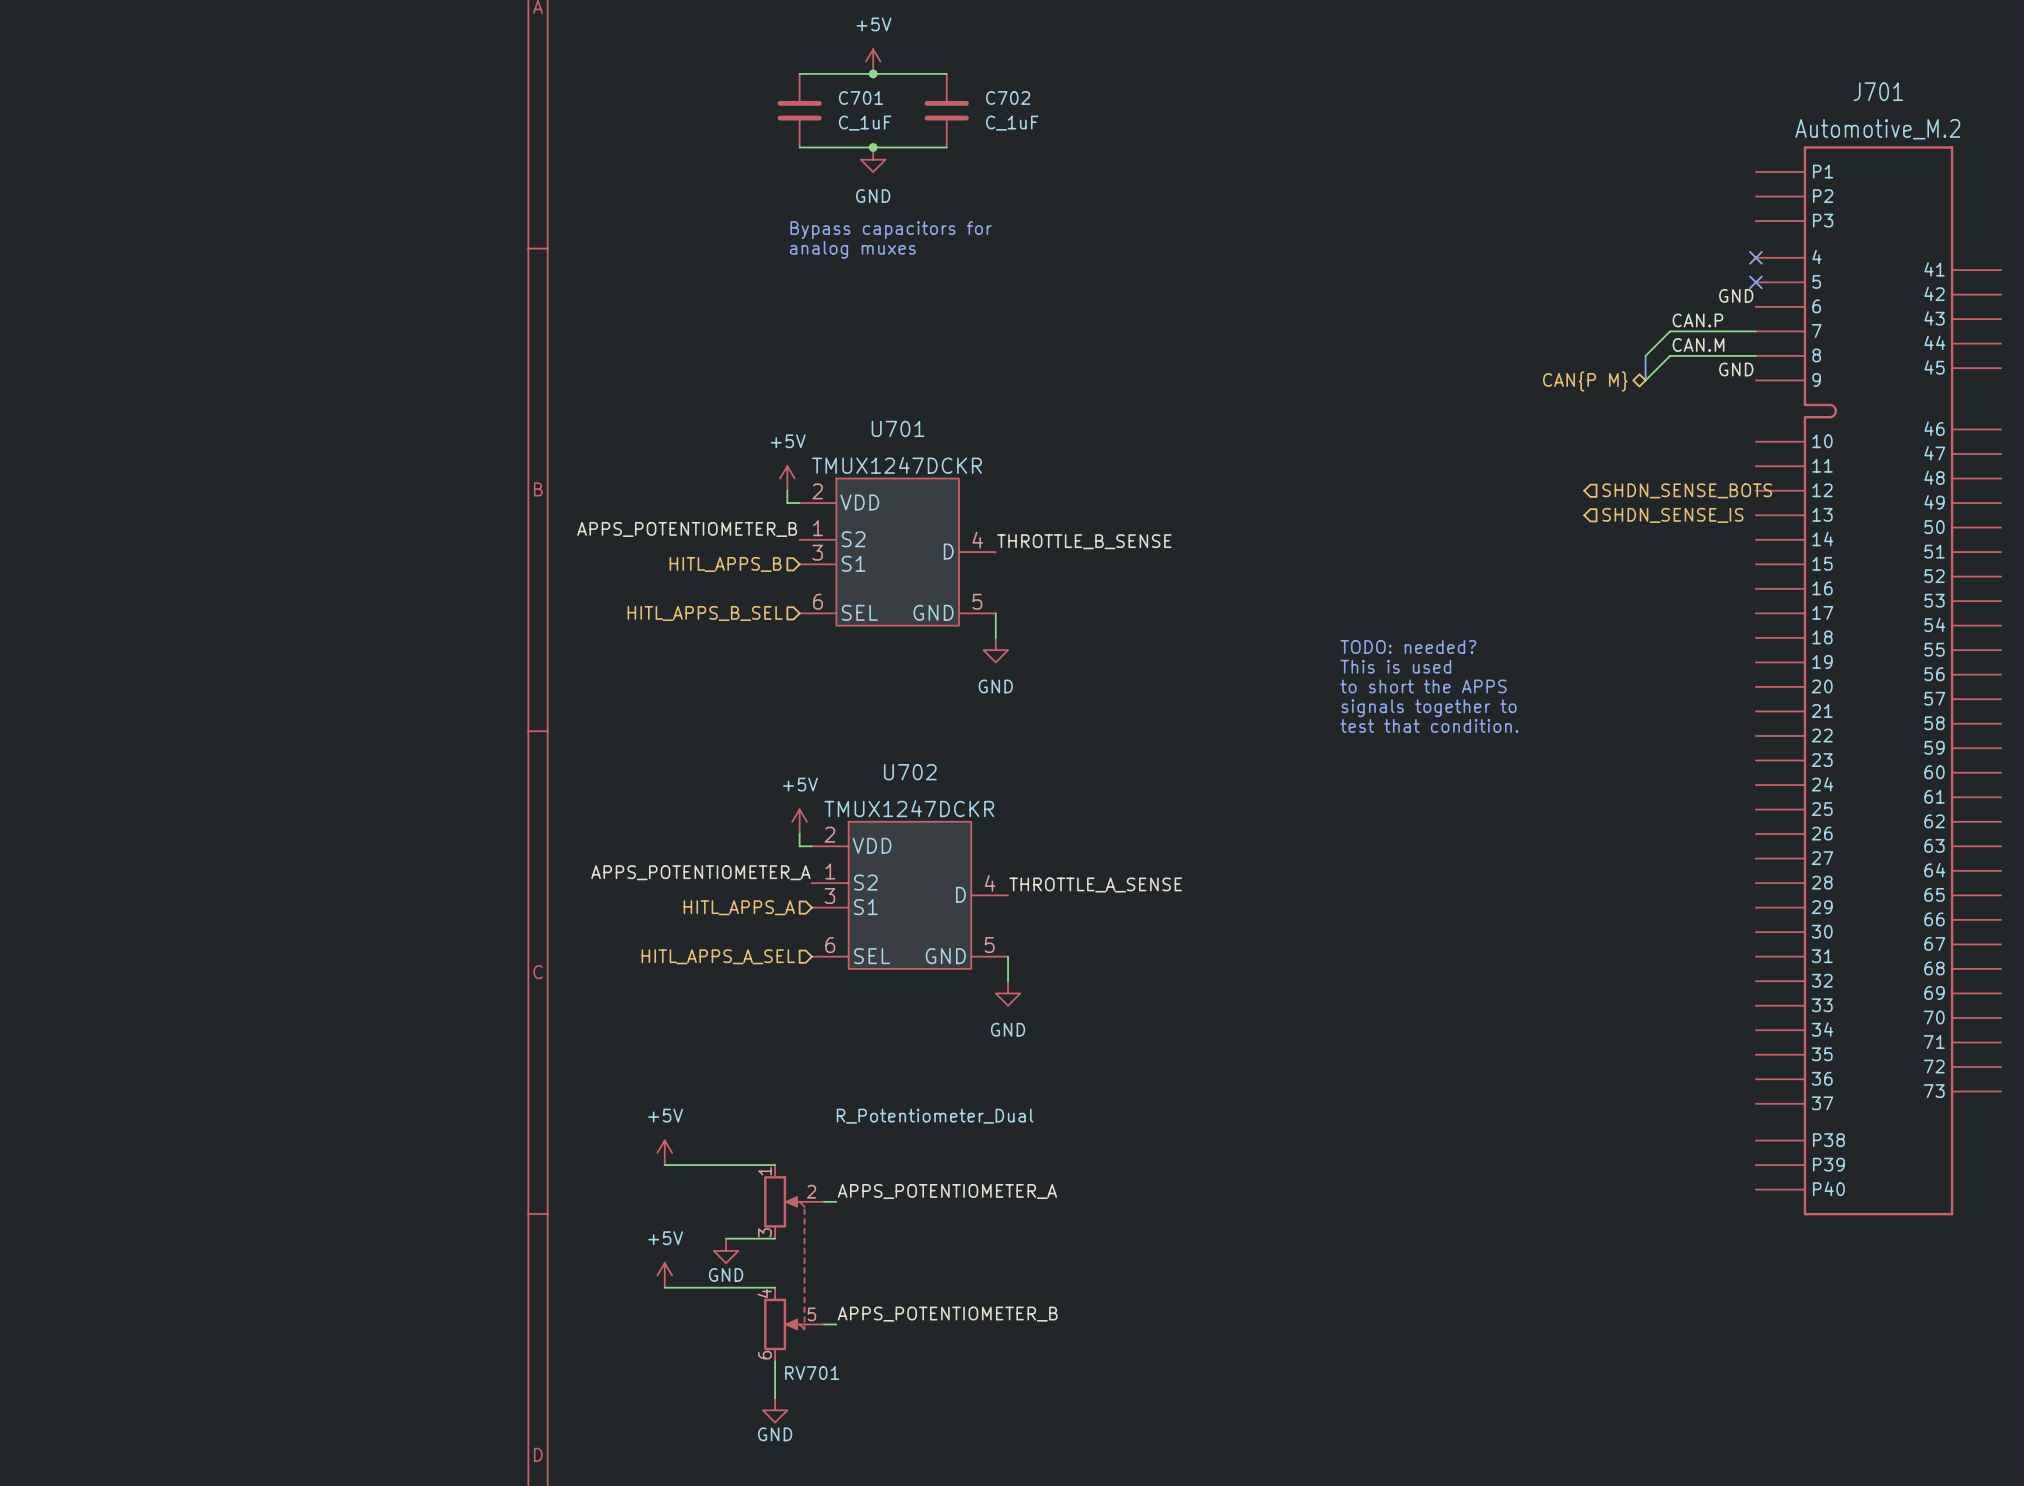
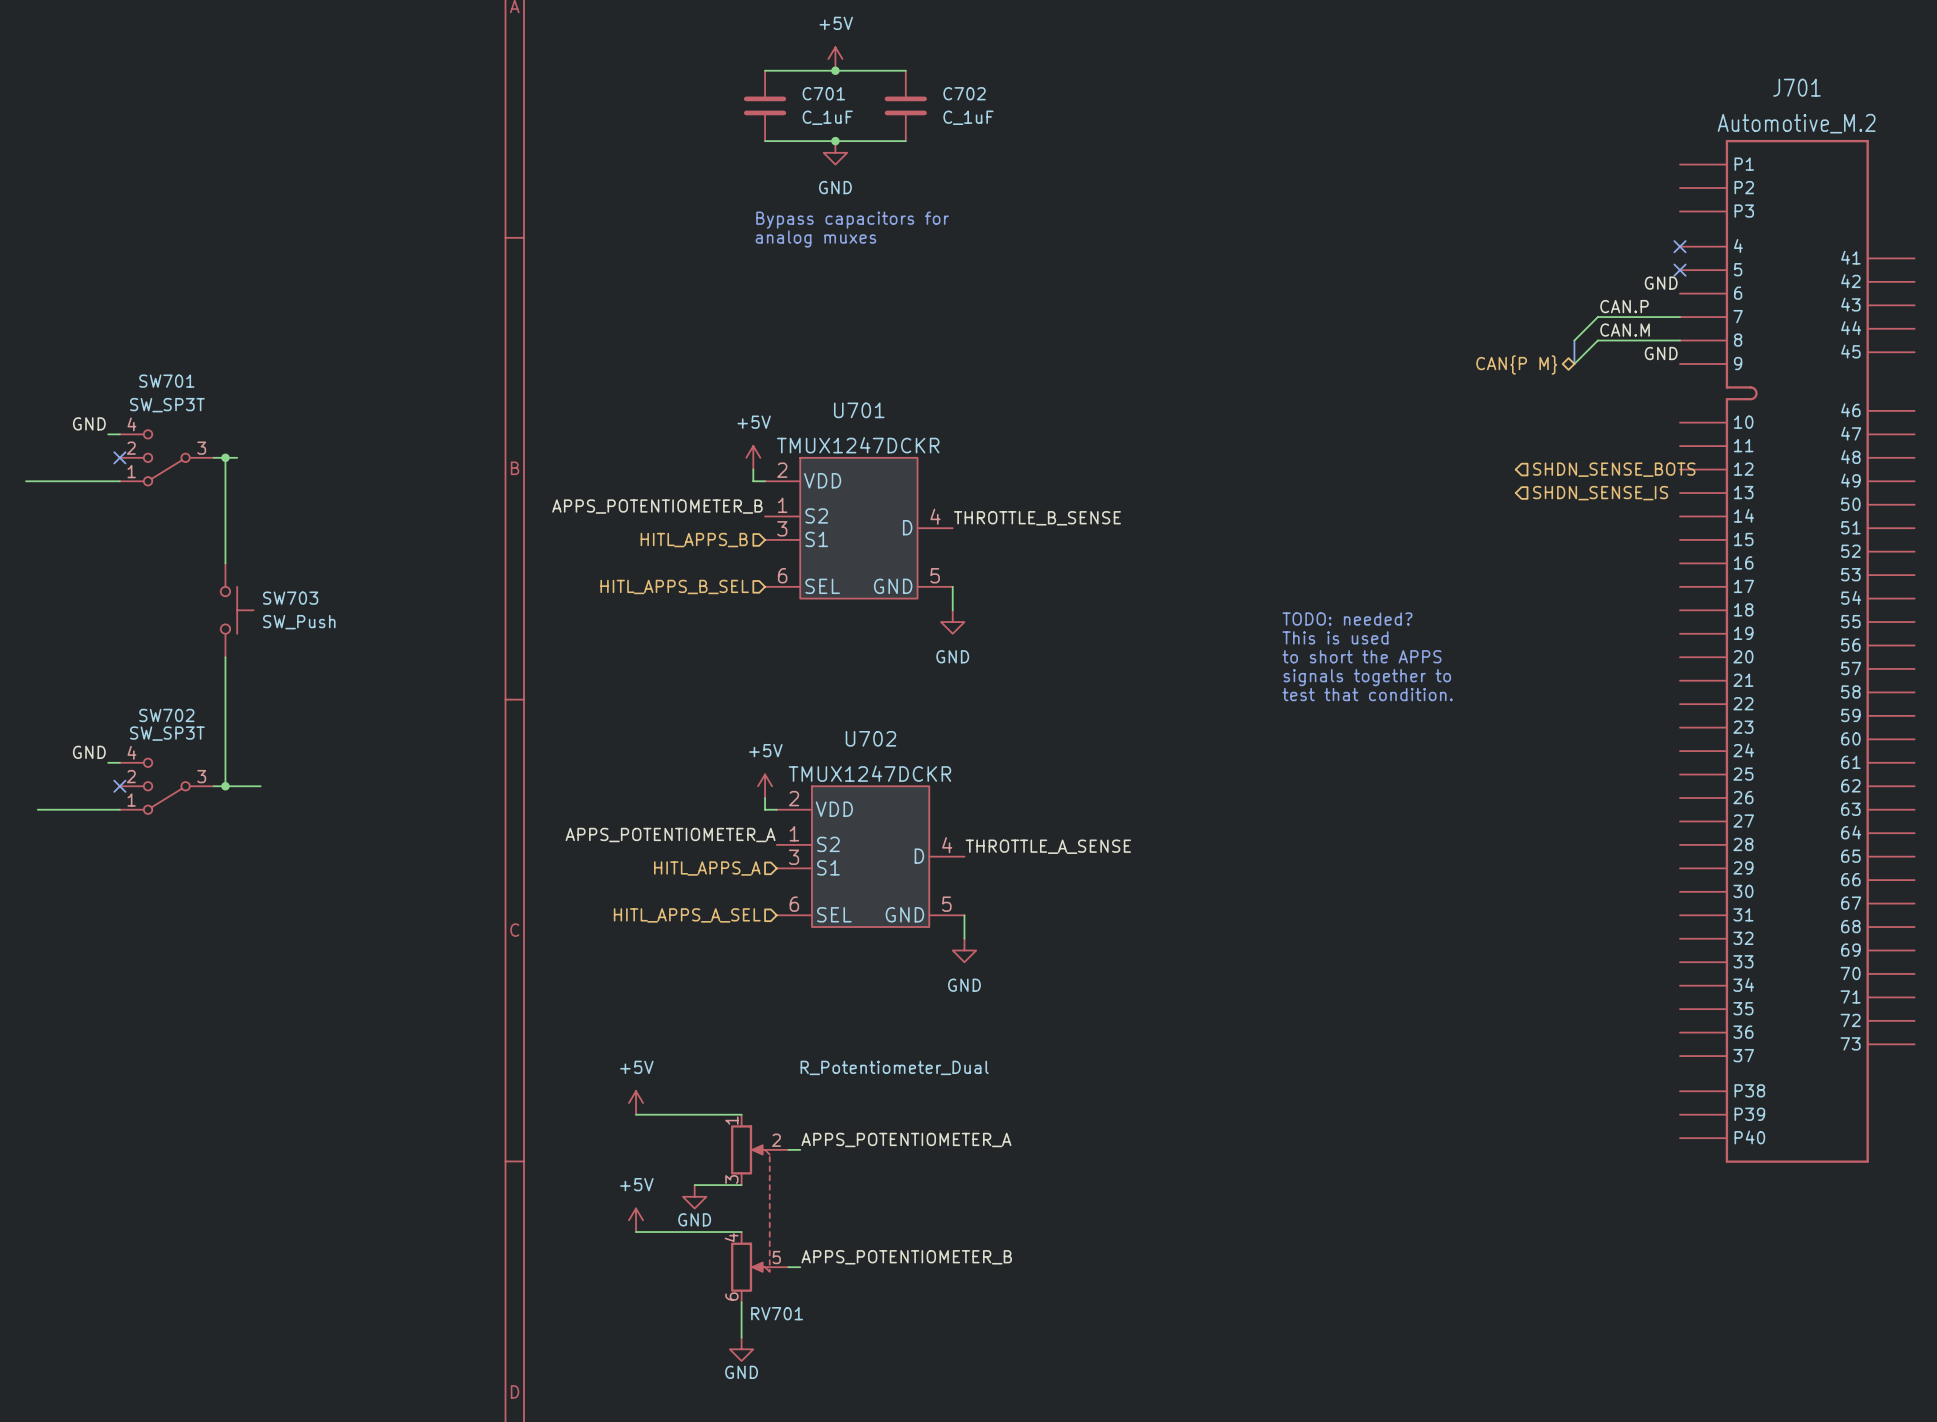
label: none -> GND (89, 423)
wire: none -> (108, 434) (119, 434)
no-connect mark: none -> (119, 457)
SW701: none -> SW_SP3T (166, 457)
wire: none -> (213, 457) (237, 457)
wire: none -> (225, 457) (225, 563)
junction: none -> (225, 457)
wire: none -> (26, 481) (119, 481)
SW703: none -> SW_Push (237, 610)
wire: none -> (225, 657) (225, 786)
label: none -> GND (89, 752)
wire: none -> (108, 762) (119, 762)
no-connect mark: none -> (119, 786)
SW702: none -> SW_SP3T (166, 786)
wire: none -> (213, 786) (260, 786)
junction: none -> (225, 786)
wire: none -> (37, 809) (119, 809)

